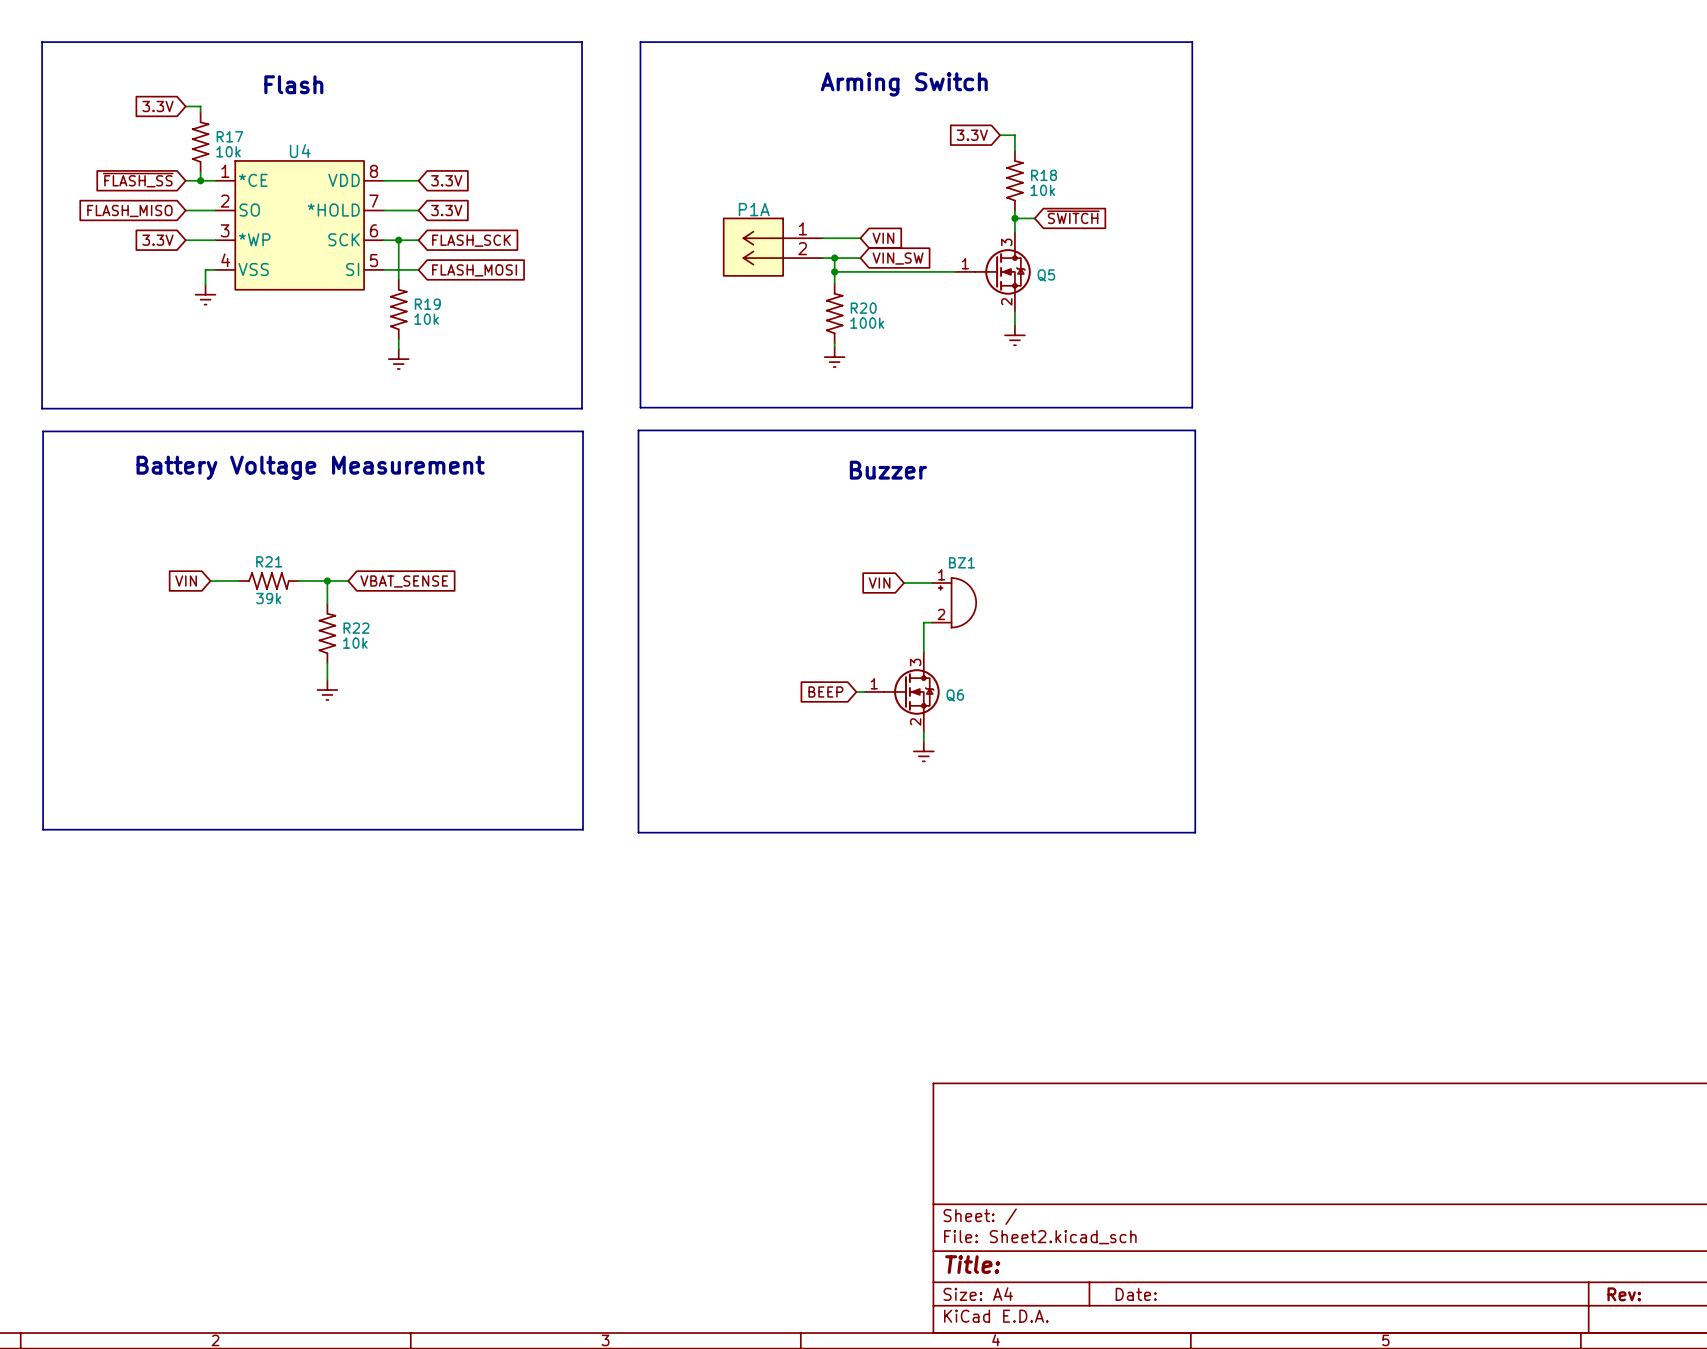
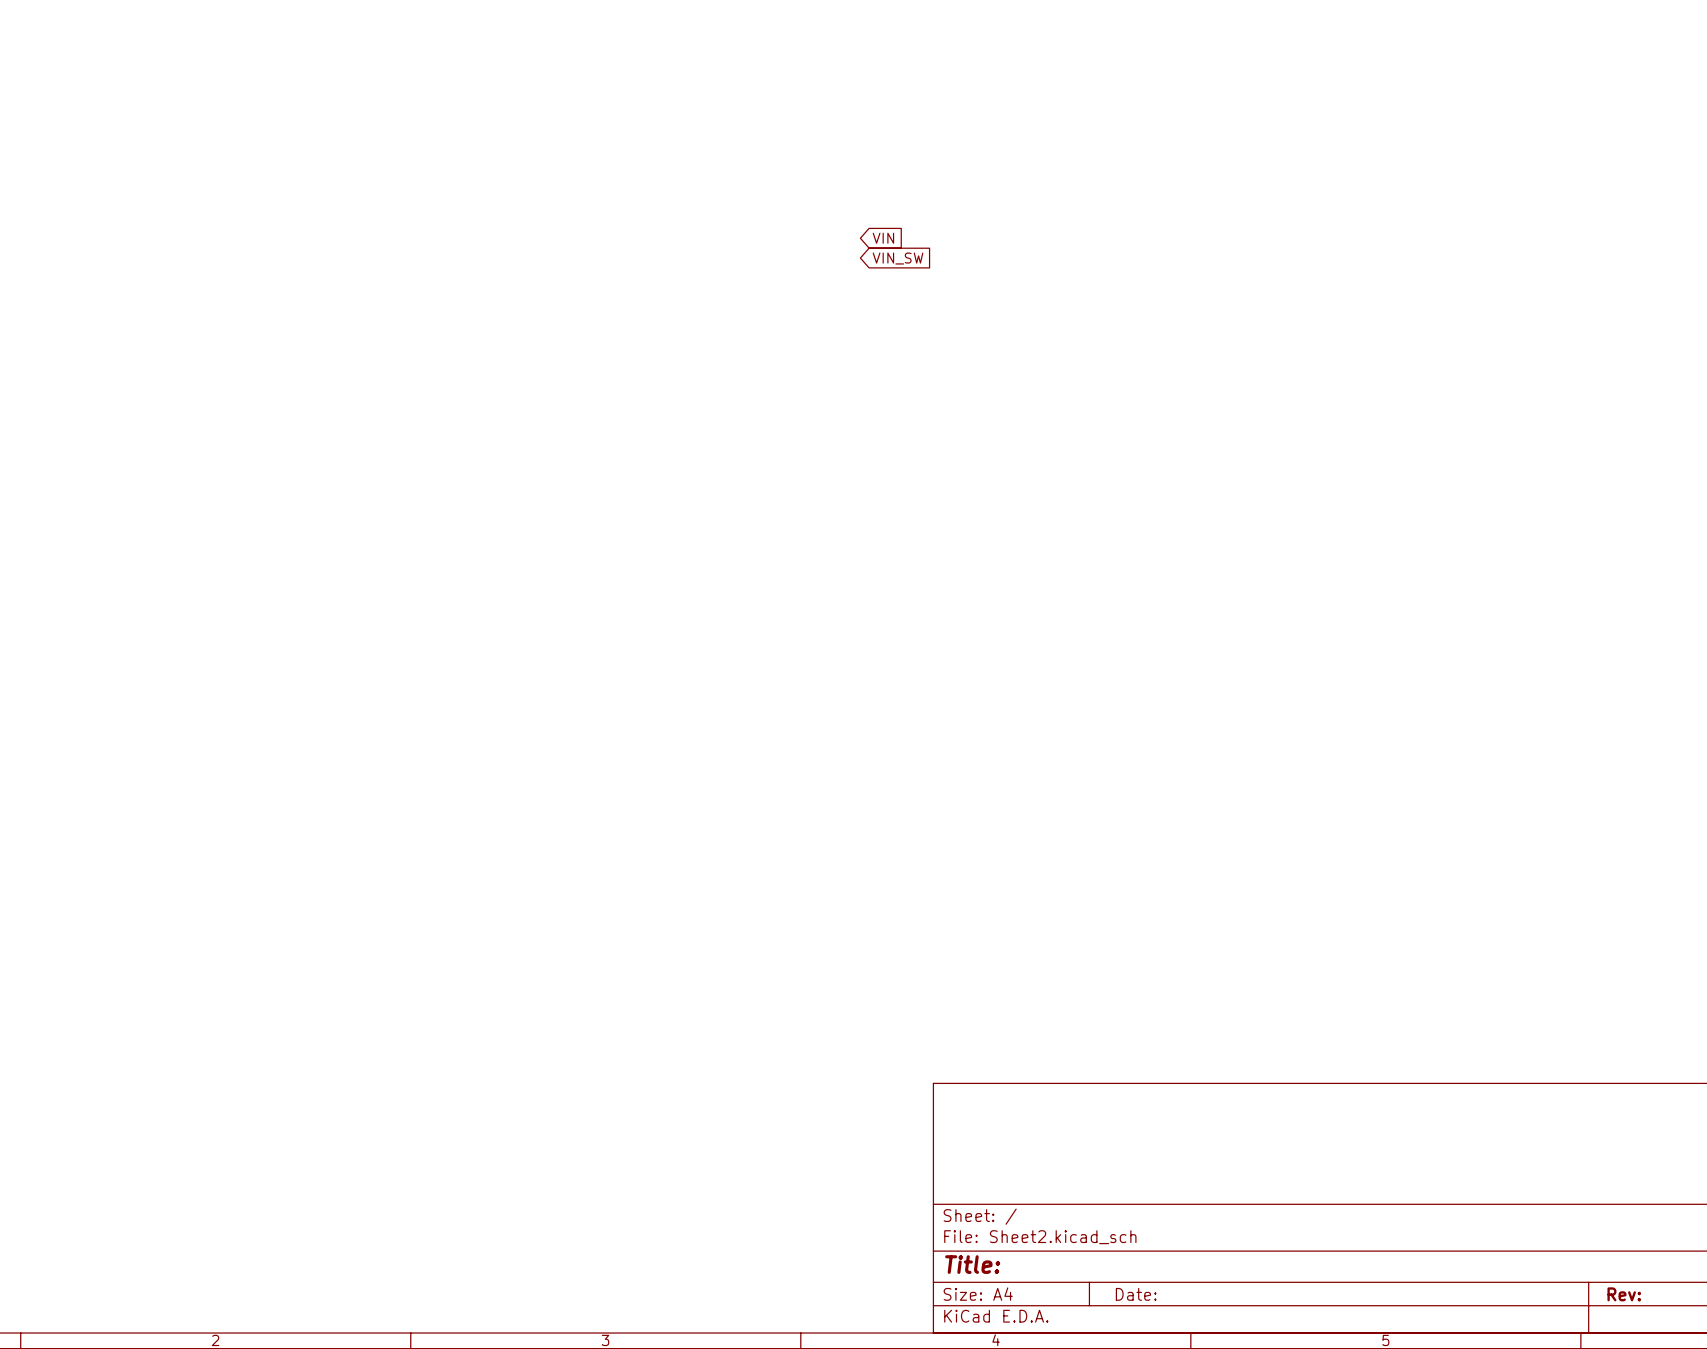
line: (42, 42) (582, 42) (582, 408) (42, 408) (42, 42) -> none
line: (640, 42) (640, 407) (1192, 407) (1192, 42) (640, 42) -> none
text: Flash (293, 84) -> none
text: Arming Switch (904, 84) -> none
global label: 3.3V (158, 106) -> none
wire: (185, 106) (200, 106) (200, 112) -> none
global label: 3.3V (972, 135) -> none
wire: (1000, 135) (1014, 135) (1014, 151) -> none
R17: 10k (200, 142) -> none
wire: (200, 171) (200, 180) -> none
global label: ~{FLASH_SS} (138, 180) -> none
wire: (185, 180) (215, 180) -> none
junction: (200, 180) -> none
wire: (383, 180) (418, 180) -> none
global label: 3.3V (446, 180) -> none
R18: 10k (1014, 180) -> none
global label: FLASH_MISO (129, 210) -> none
wire: (185, 210) (215, 210) -> none
wire: (383, 210) (418, 210) -> none
global label: 3.3V (446, 210) -> none
wire: (1014, 210) (1014, 232) -> none
global label: ~{SWITCH} (1073, 217) -> none
wire: (1014, 218) (1034, 218) -> none
junction: (1014, 218) -> none
U4: (299, 225) -> none
wire: (822, 238) (860, 238) -> none
global label: 3.3V (158, 240) -> none
wire: (185, 240) (215, 240) -> none
wire: (383, 240) (418, 240) -> none
wire: (398, 240) (398, 279) -> none
junction: (398, 240) -> none
global label: FLASH_SCK (471, 240) -> none
P1A: (772, 247) -> none
wire: (822, 258) (860, 258) -> none
wire: (834, 258) (834, 283) -> none
junction: (834, 258) -> none
wire: (215, 269) (205, 269) (205, 284) -> none
wire: (383, 269) (418, 269) -> none
global label: FLASH_MOSI (474, 270) -> none
wire: (834, 271) (955, 271) -> none
junction: (834, 271) -> none
Q5: (993, 271) -> none
power symbol: (205, 294) -> none
R19: 10k (398, 309) -> none
wire: (1014, 311) (1014, 325) -> none
R20: 100k (834, 313) -> none
power symbol: (1014, 335) -> none
wire: (398, 339) (398, 349) -> none
wire: (834, 343) (834, 347) -> none
power symbol: (834, 357) -> none
power symbol: (398, 359) -> none
line: (638, 430) (1195, 430) (1195, 832) (638, 832) (638, 430) -> none
line: (43, 431) (583, 431) (583, 829) (43, 829) (43, 431) -> none
text: Battery Voltage Measurement (310, 467) -> none
text: Buzzer (888, 470) -> none
global label: VIN (186, 581) -> none
wire: (210, 581) (239, 581) -> none
R21: 39k (268, 581) -> none
wire: (298, 581) (348, 581) -> none
wire: (327, 581) (327, 603) -> none
junction: (327, 581) -> none
global label: VBAT_SENSE (404, 581) -> none
global label: VIN (879, 583) -> none
wire: (903, 583) (931, 583) -> none
BZ1: (953, 602) -> none
wire: (931, 622) (923, 622) (923, 652) -> none
R22: 10k (327, 633) -> none
wire: (327, 663) (327, 680) -> none
power symbol: (327, 690) -> none
global label: BEEP (825, 691) -> none
wire: (856, 691) (864, 691) -> none
Q6: (902, 691) -> none
wire: (923, 731) (923, 741) -> none
power symbol: (923, 751) -> none

